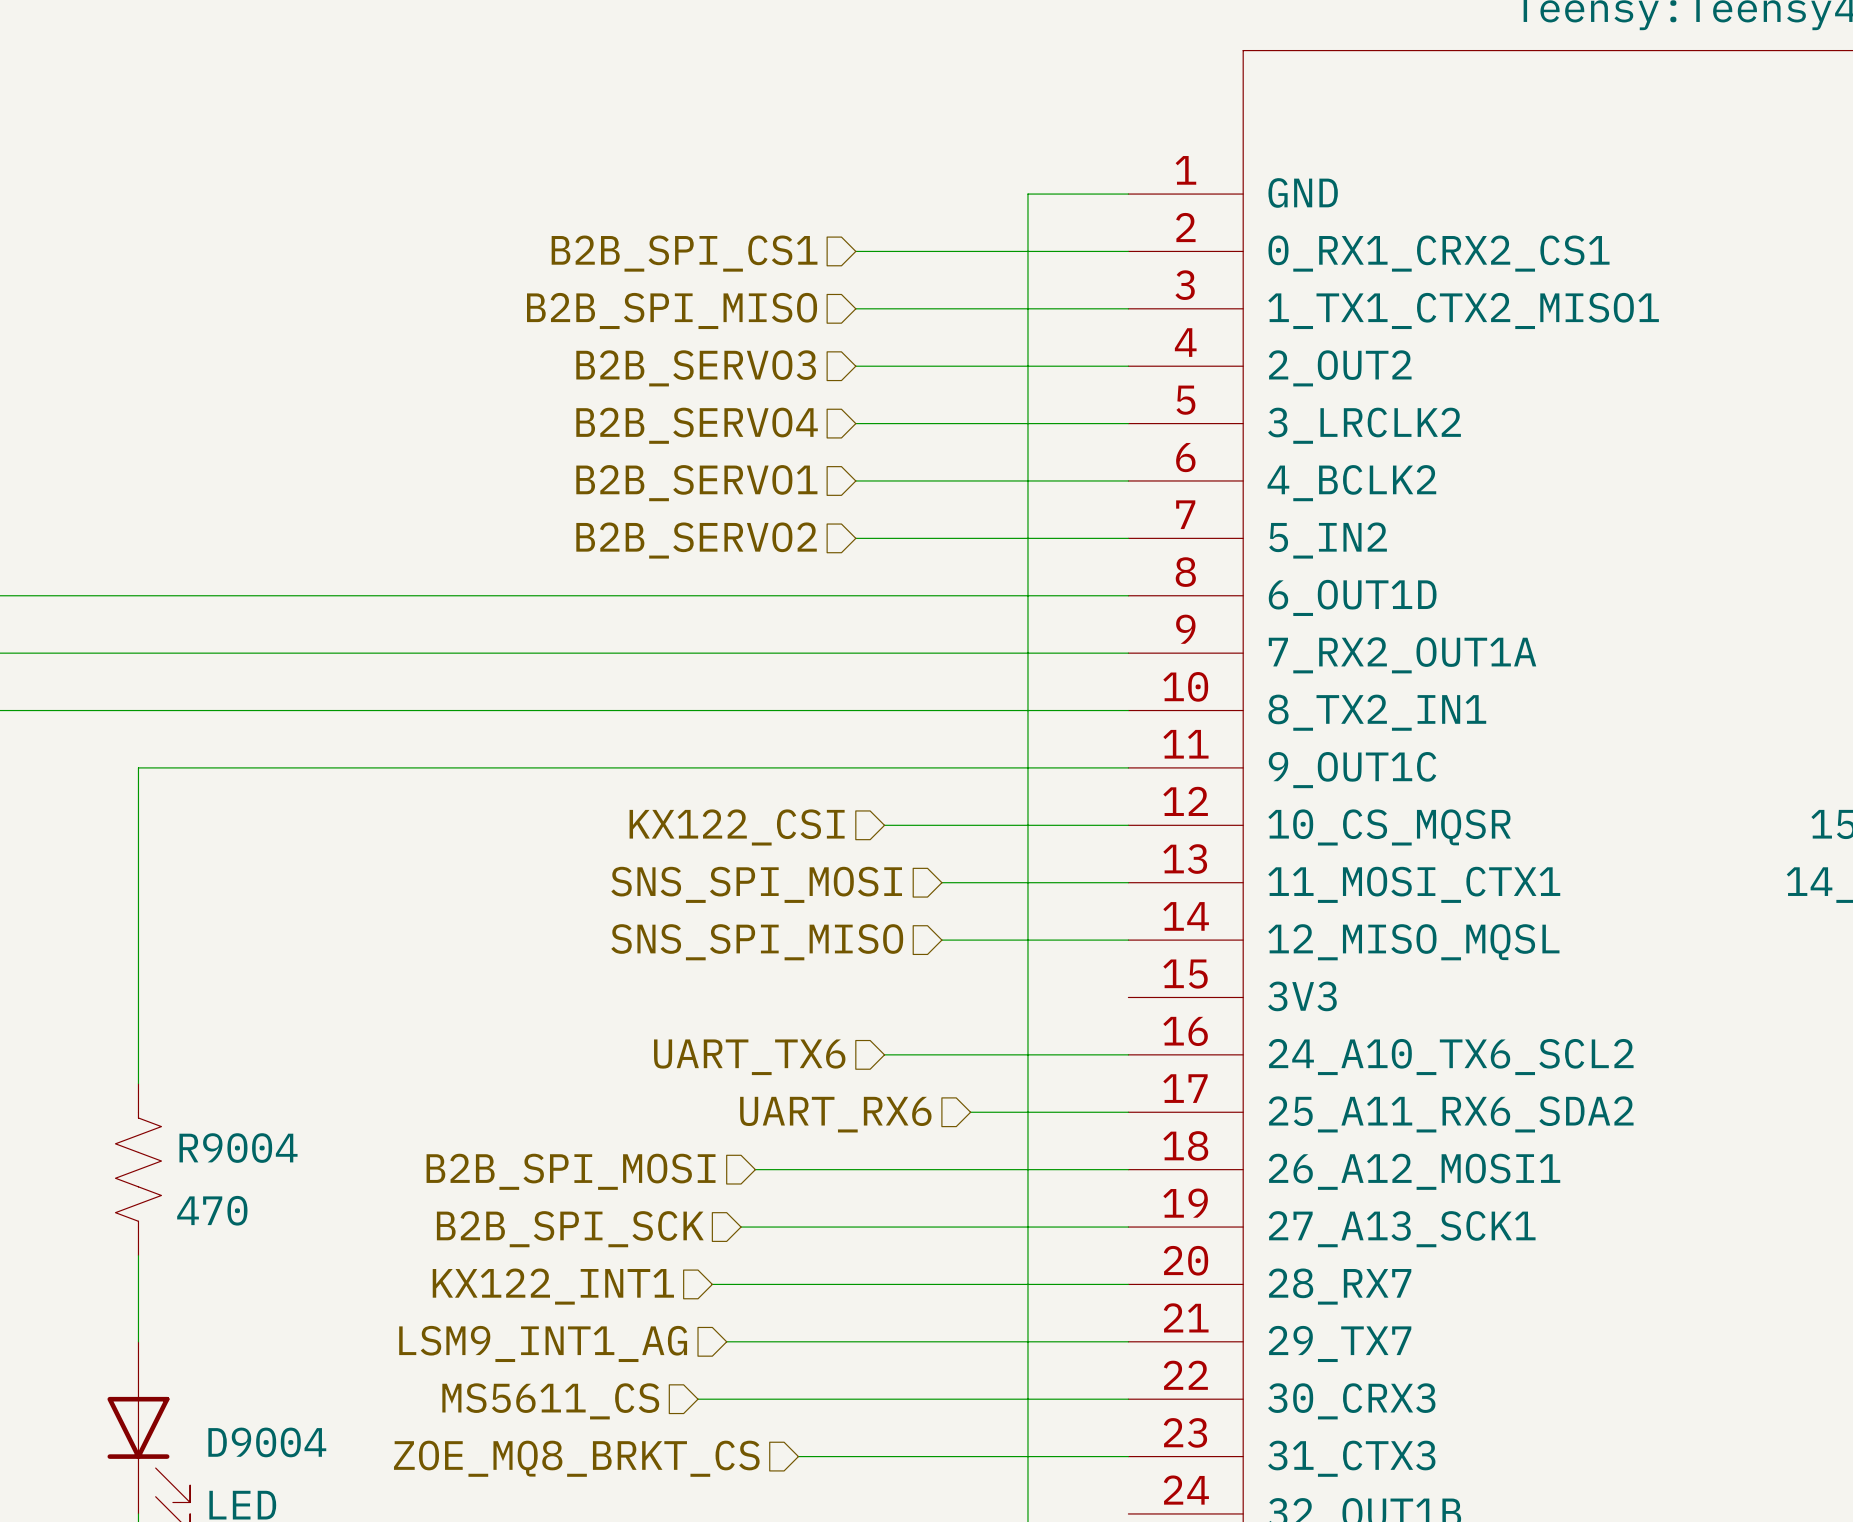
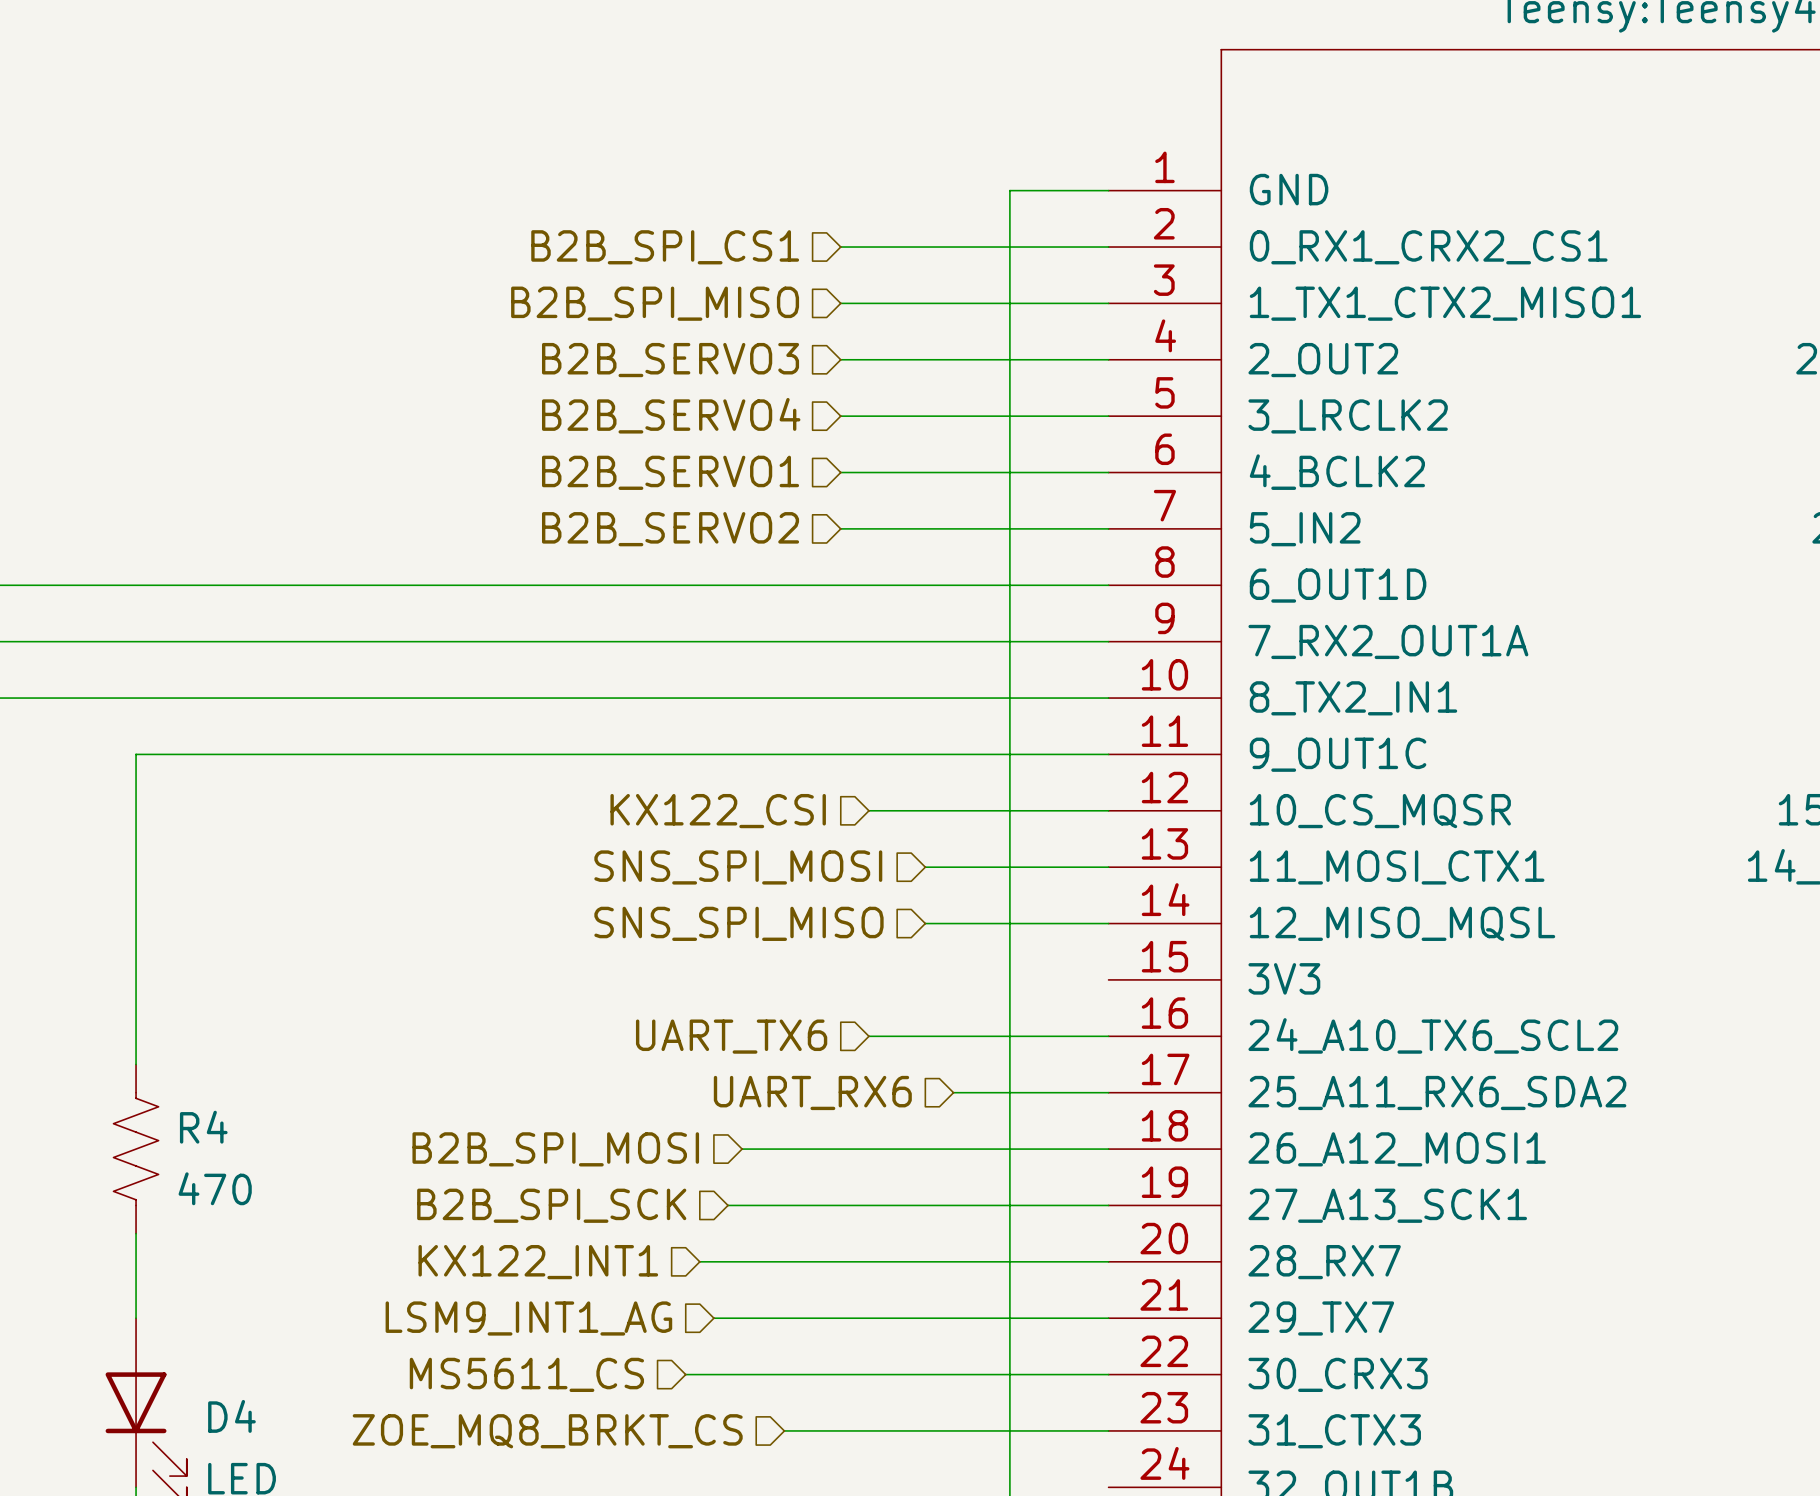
R9004 name: R9004 (238, 1148) -> R4 (203, 1127)
D9004 name: D9004 (267, 1442) -> D4 (231, 1416)

